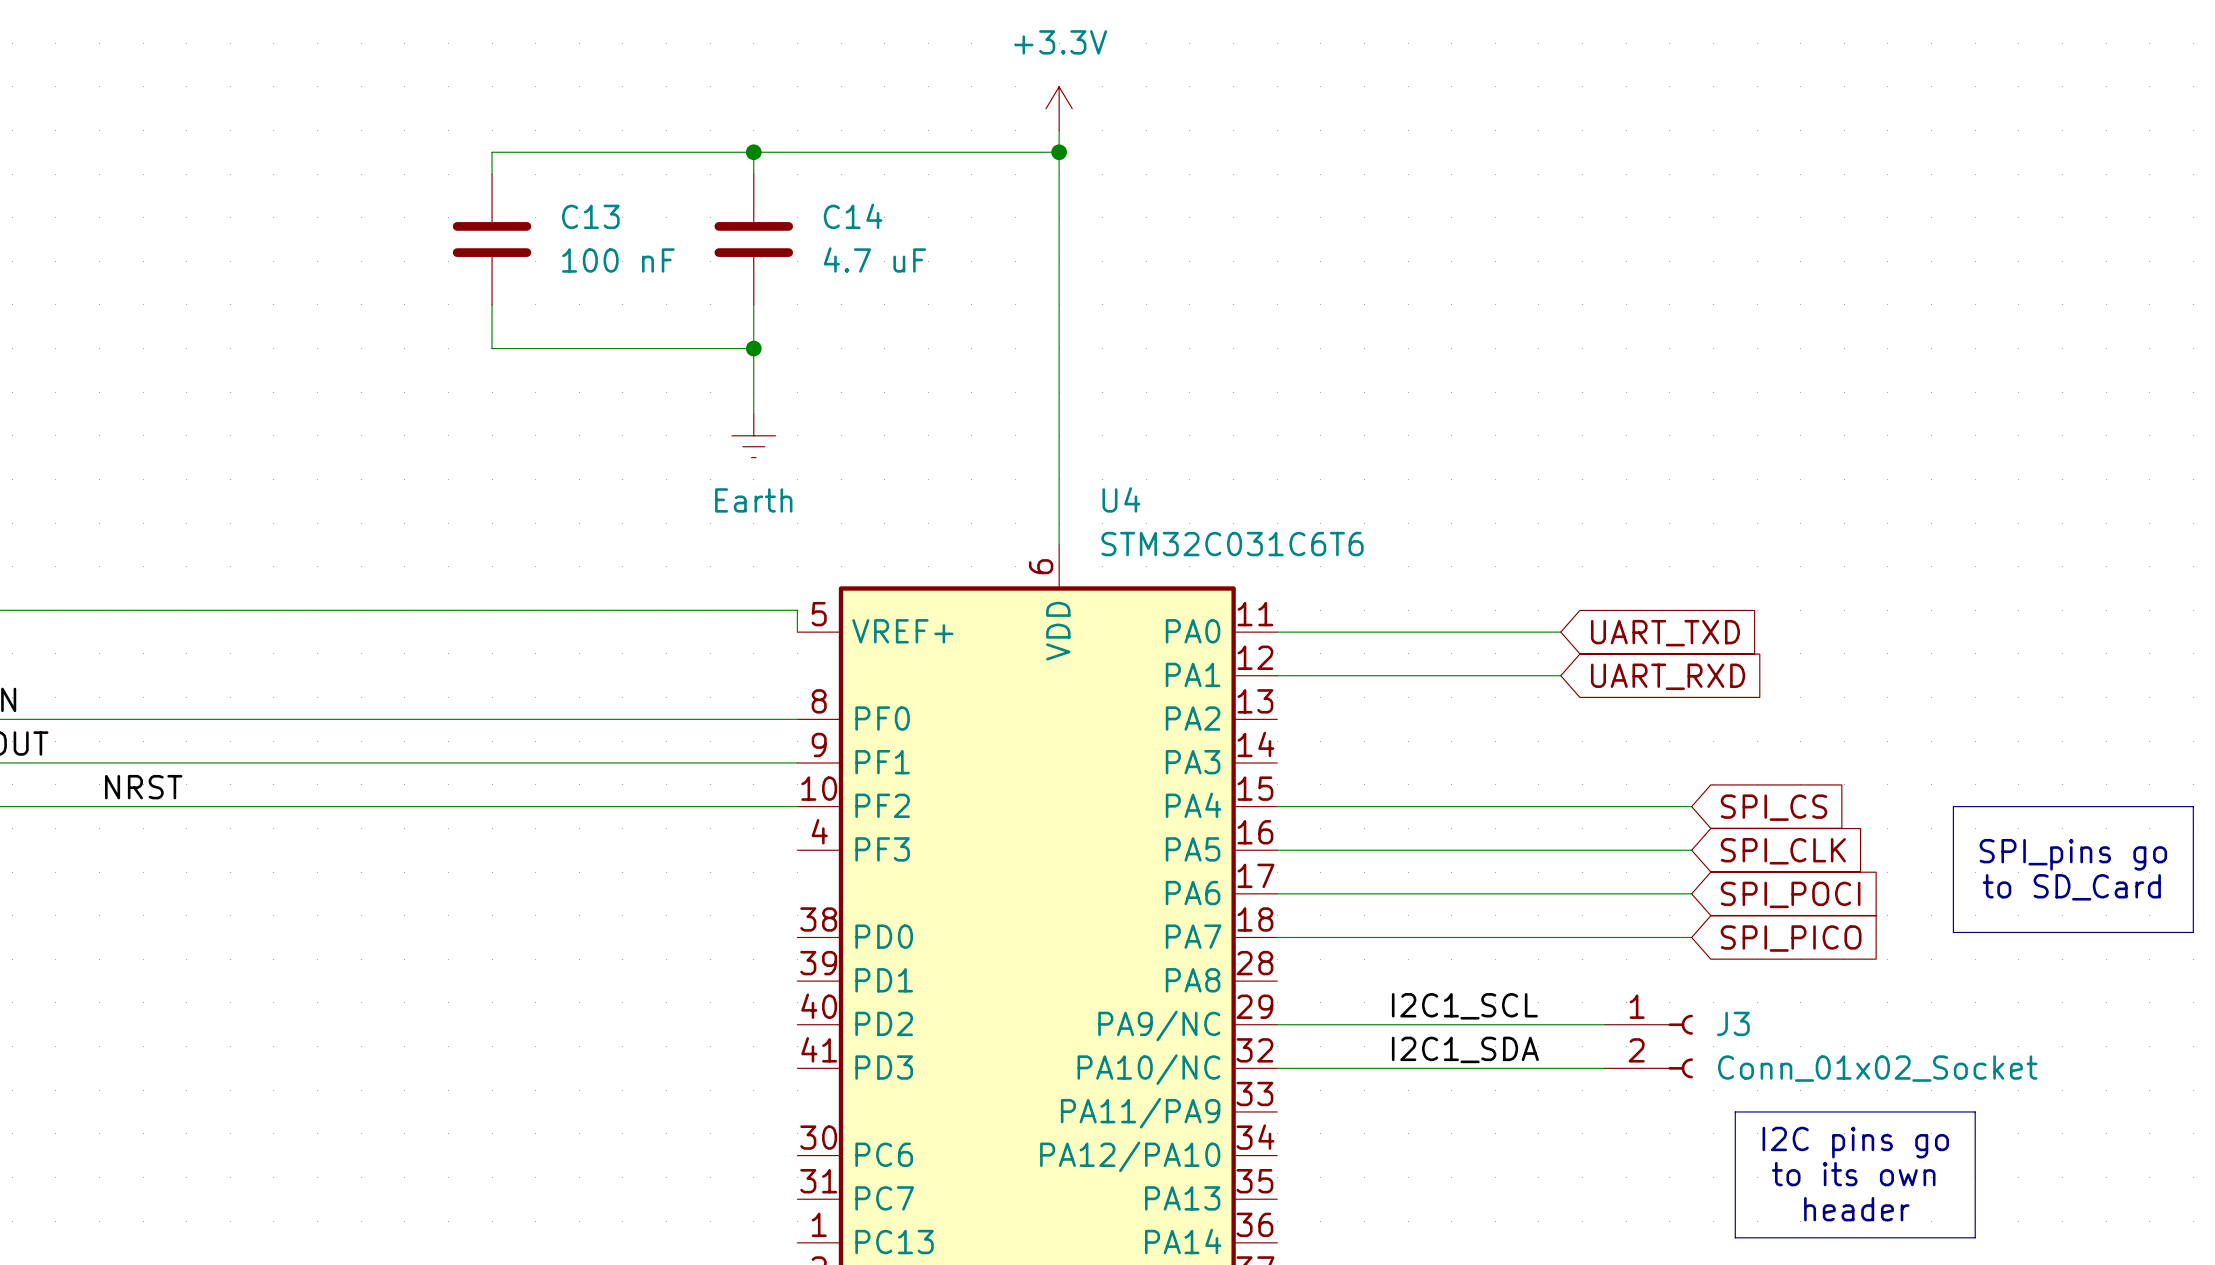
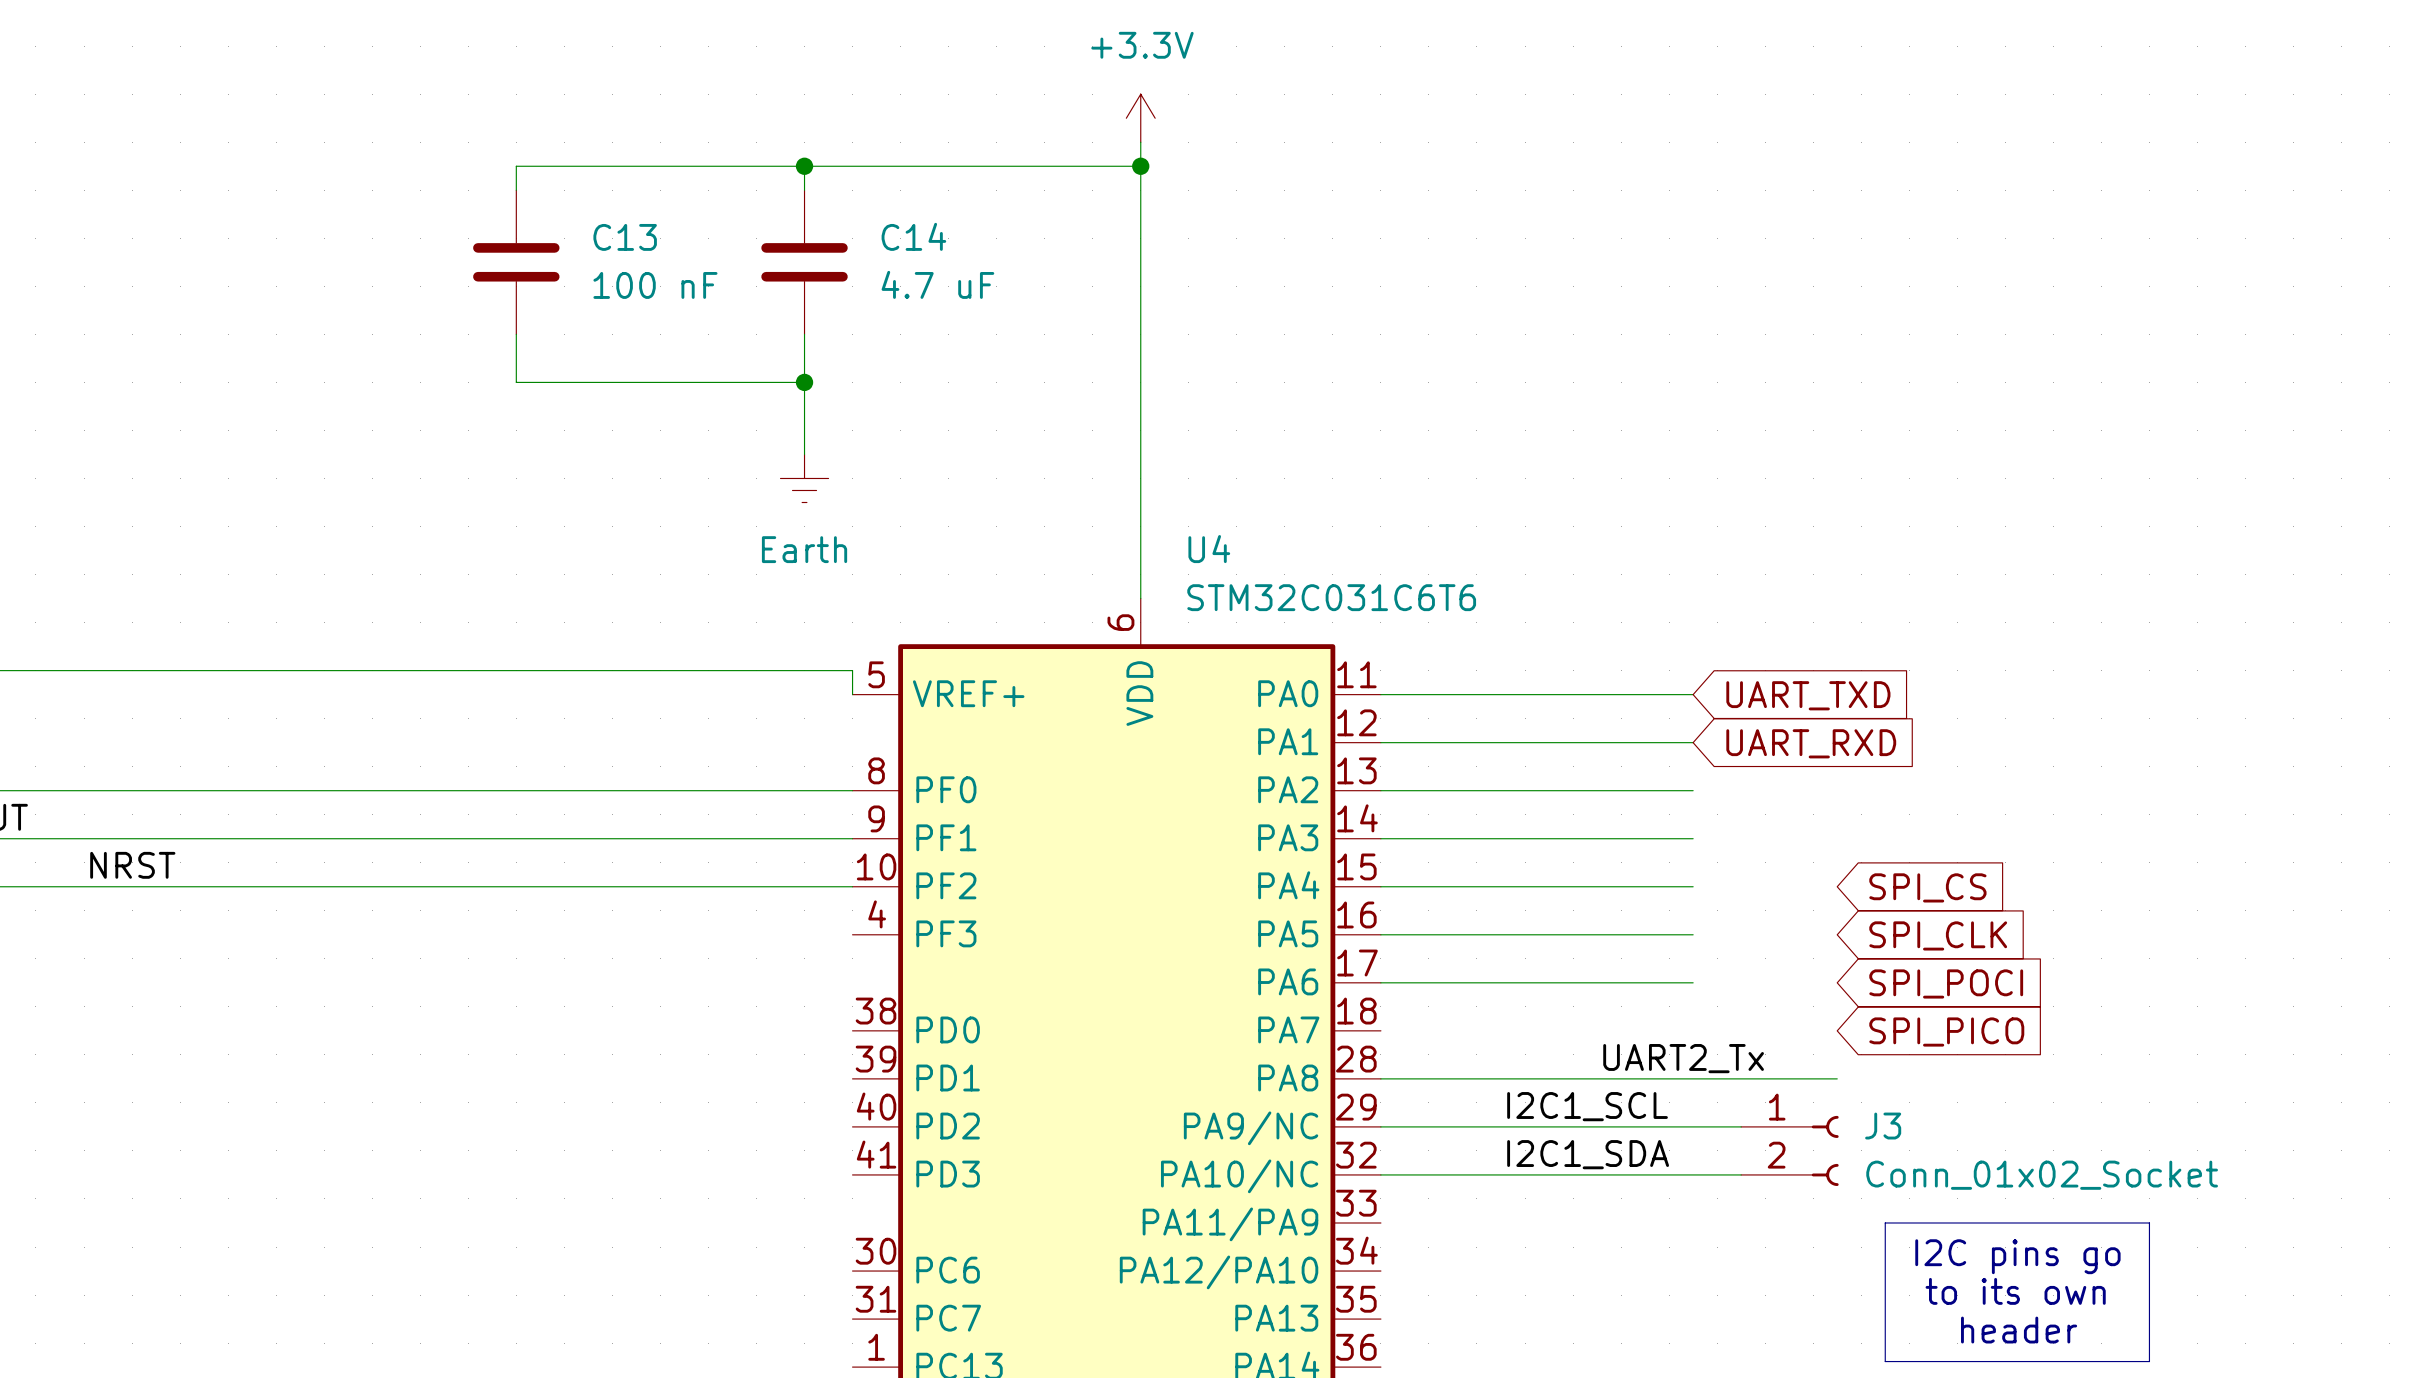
wire: none -> (1380, 790) (1693, 790)
wire: none -> (1380, 838) (1693, 838)
wire: (1560, 806) (1691, 806) -> none
line: (1953, 806) (2193, 806) (2193, 932) (1953, 932) (1953, 806) -> none
wire: (1560, 850) (1691, 850) -> none
text: SPI_pins go (2073, 854) -> none
text: to SD_Card (2071, 887) -> none
wire: (1560, 893) (1691, 893) -> none
wire: (1277, 937) (1691, 937) -> (1380, 1078) (1837, 1078)
label: none -> UART2_Tx (1683, 1058)

